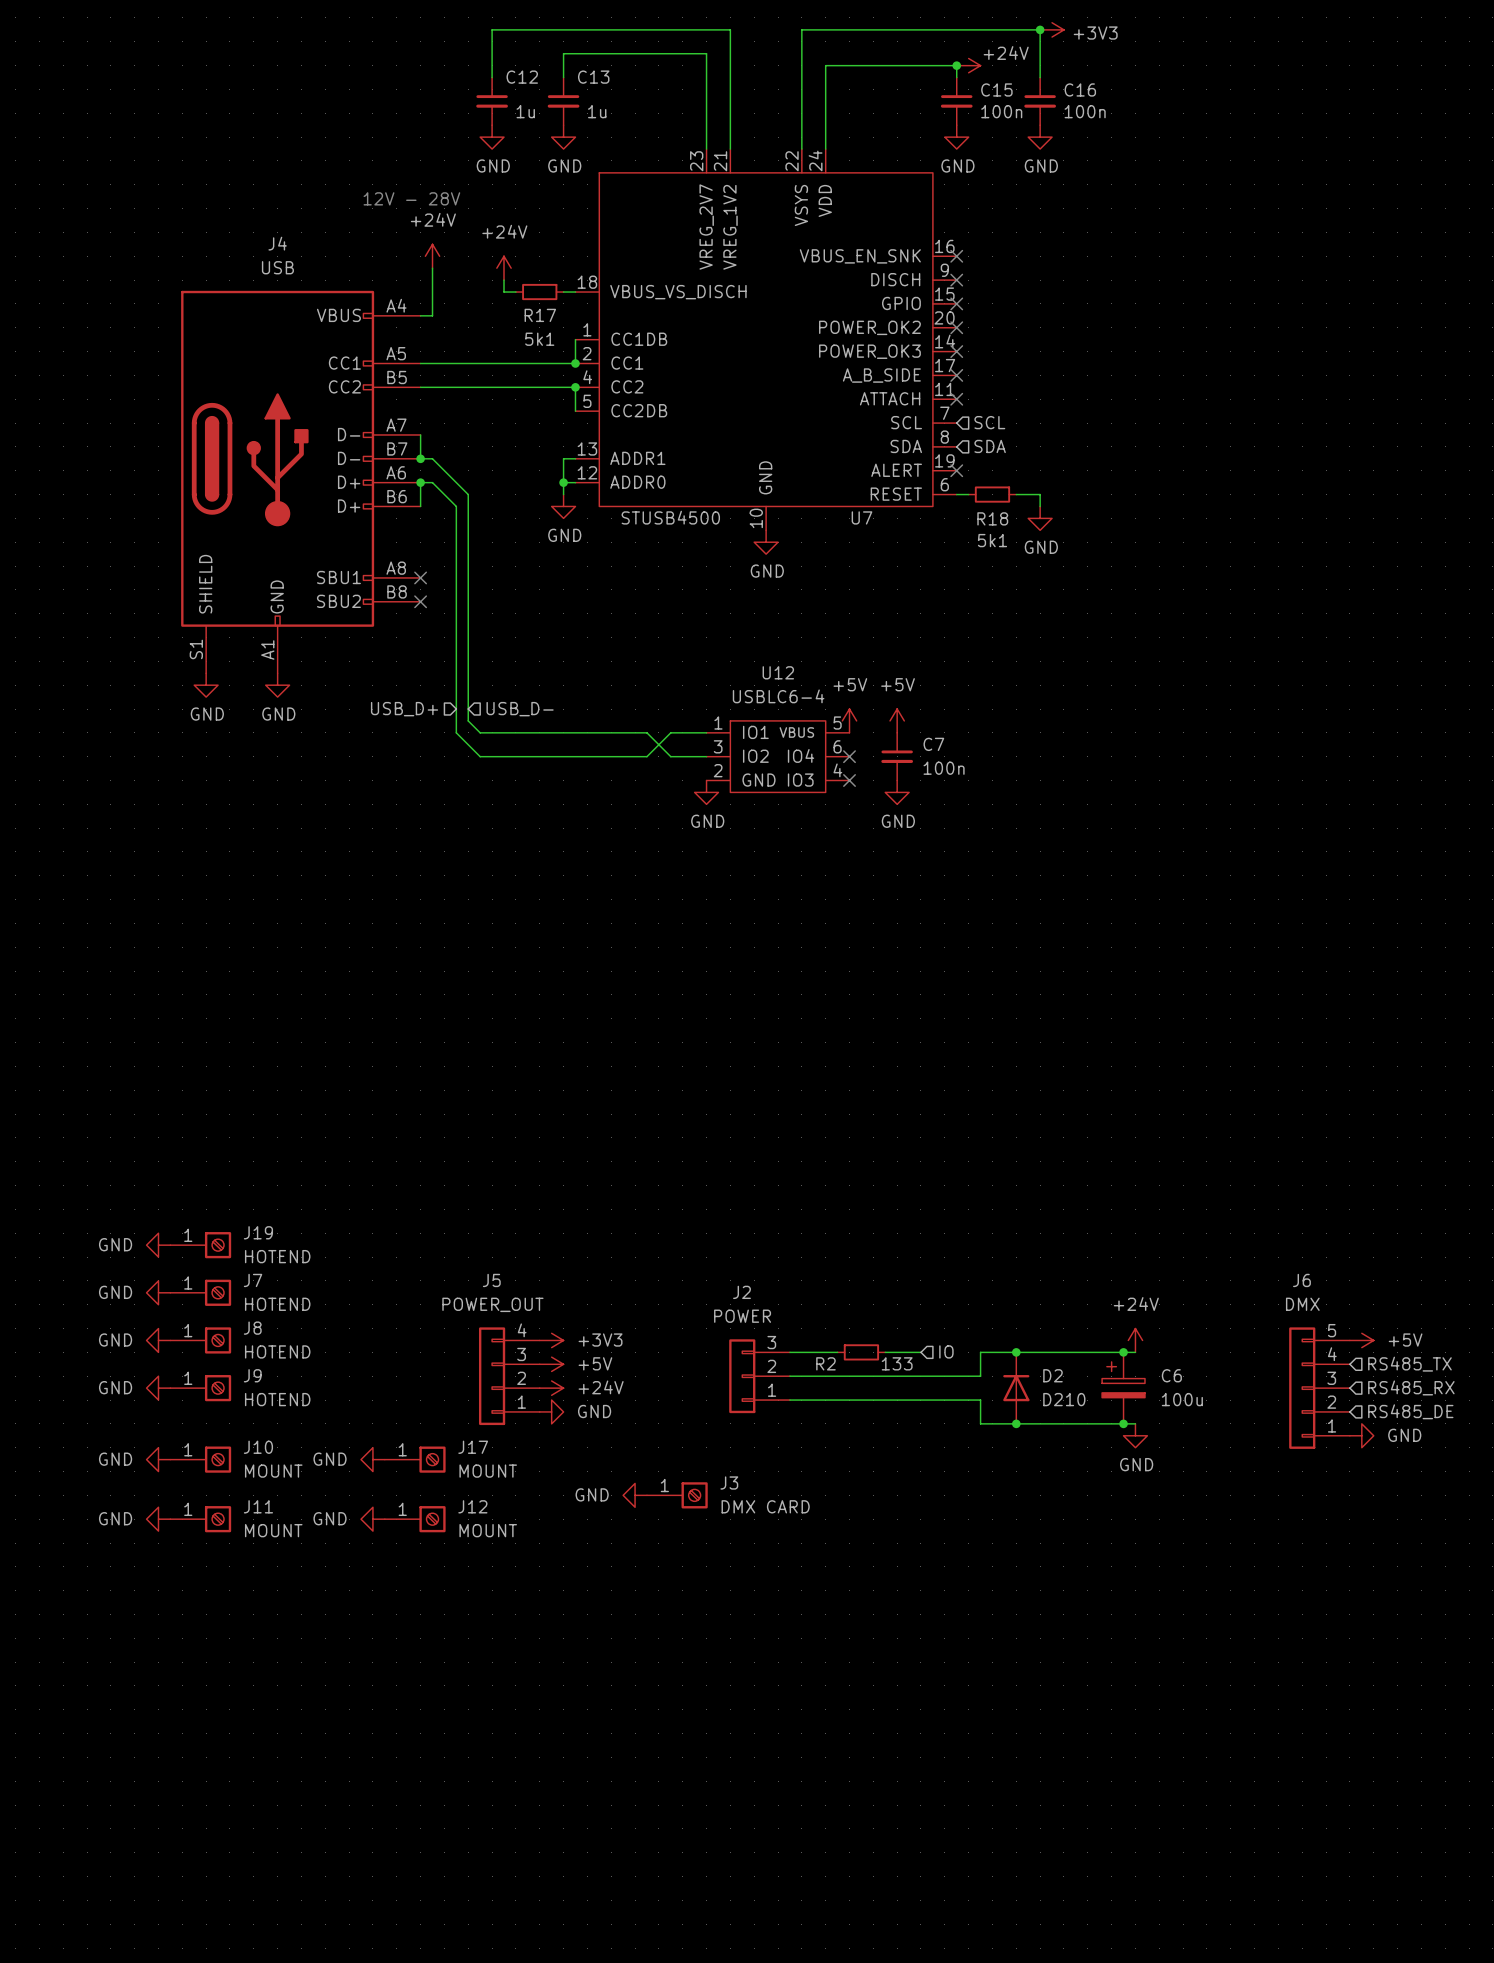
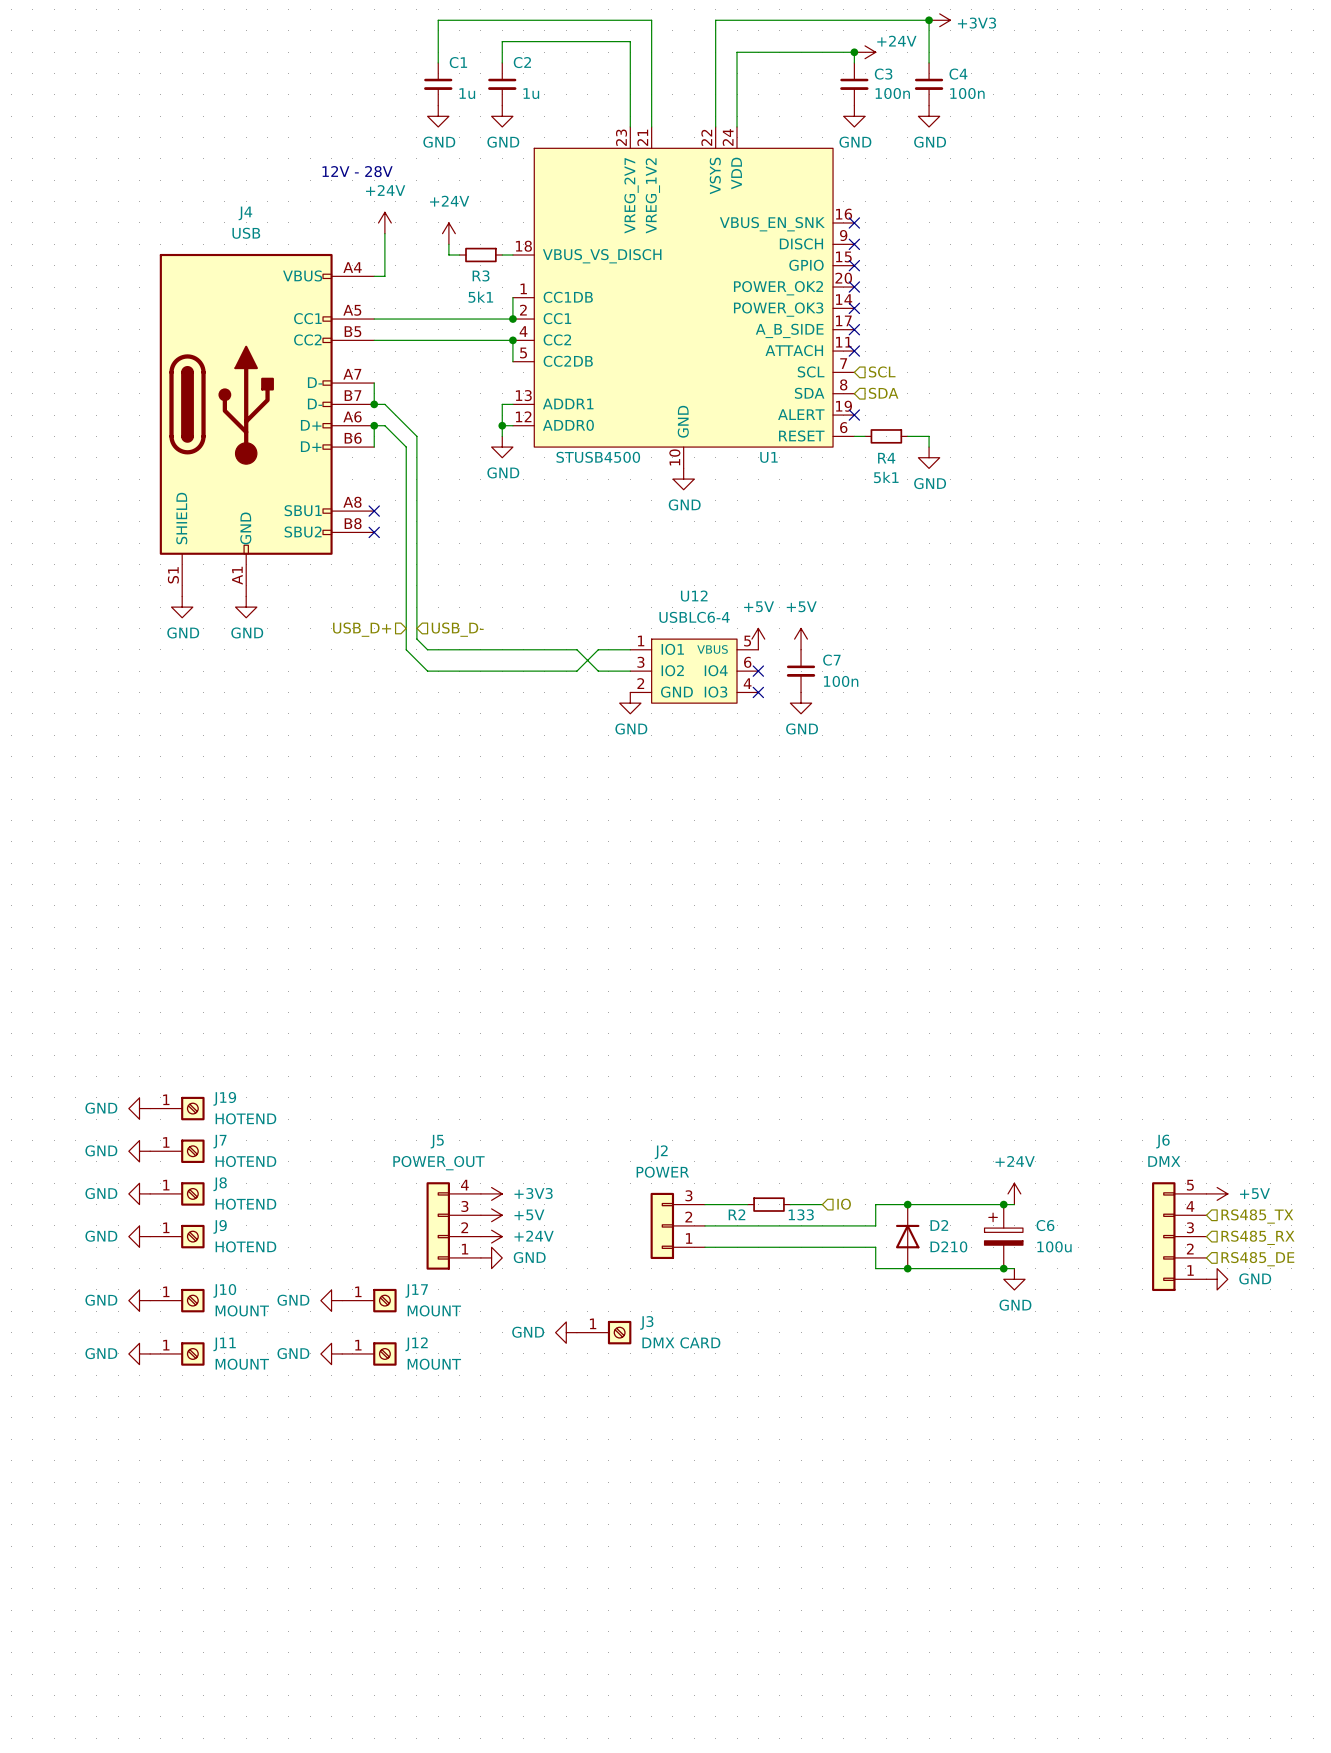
C12 name: C12 (522, 77) -> C1 (458, 62)
C13 name: C13 (593, 77) -> C2 (522, 62)
C15 name: C15 (996, 89) -> C3 (883, 74)
C16 name: C16 (1080, 89) -> C4 (958, 74)
R17 name: R17 (540, 315) -> R3 (481, 275)
U7 name: U7 (861, 517) -> U1 (768, 457)
R18 name: R18 (992, 518) -> R4 (886, 458)

